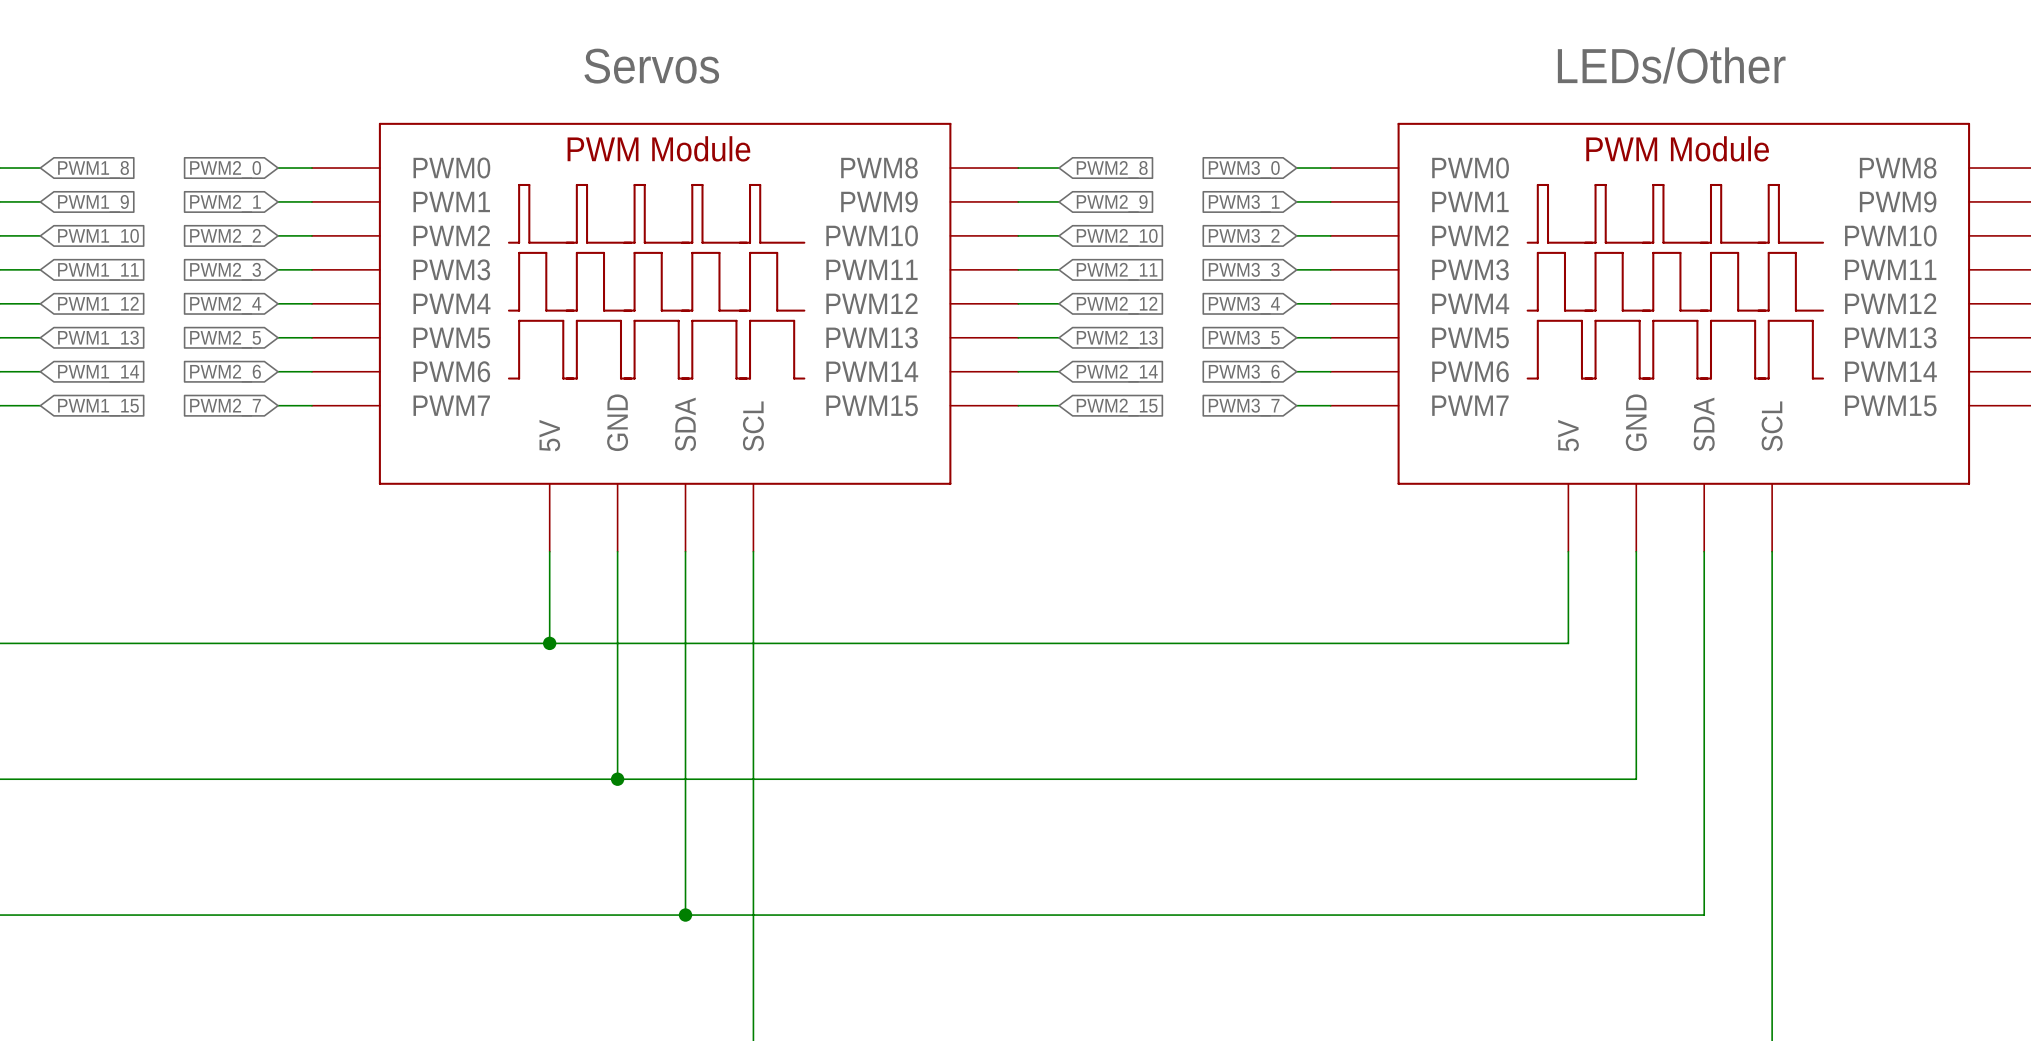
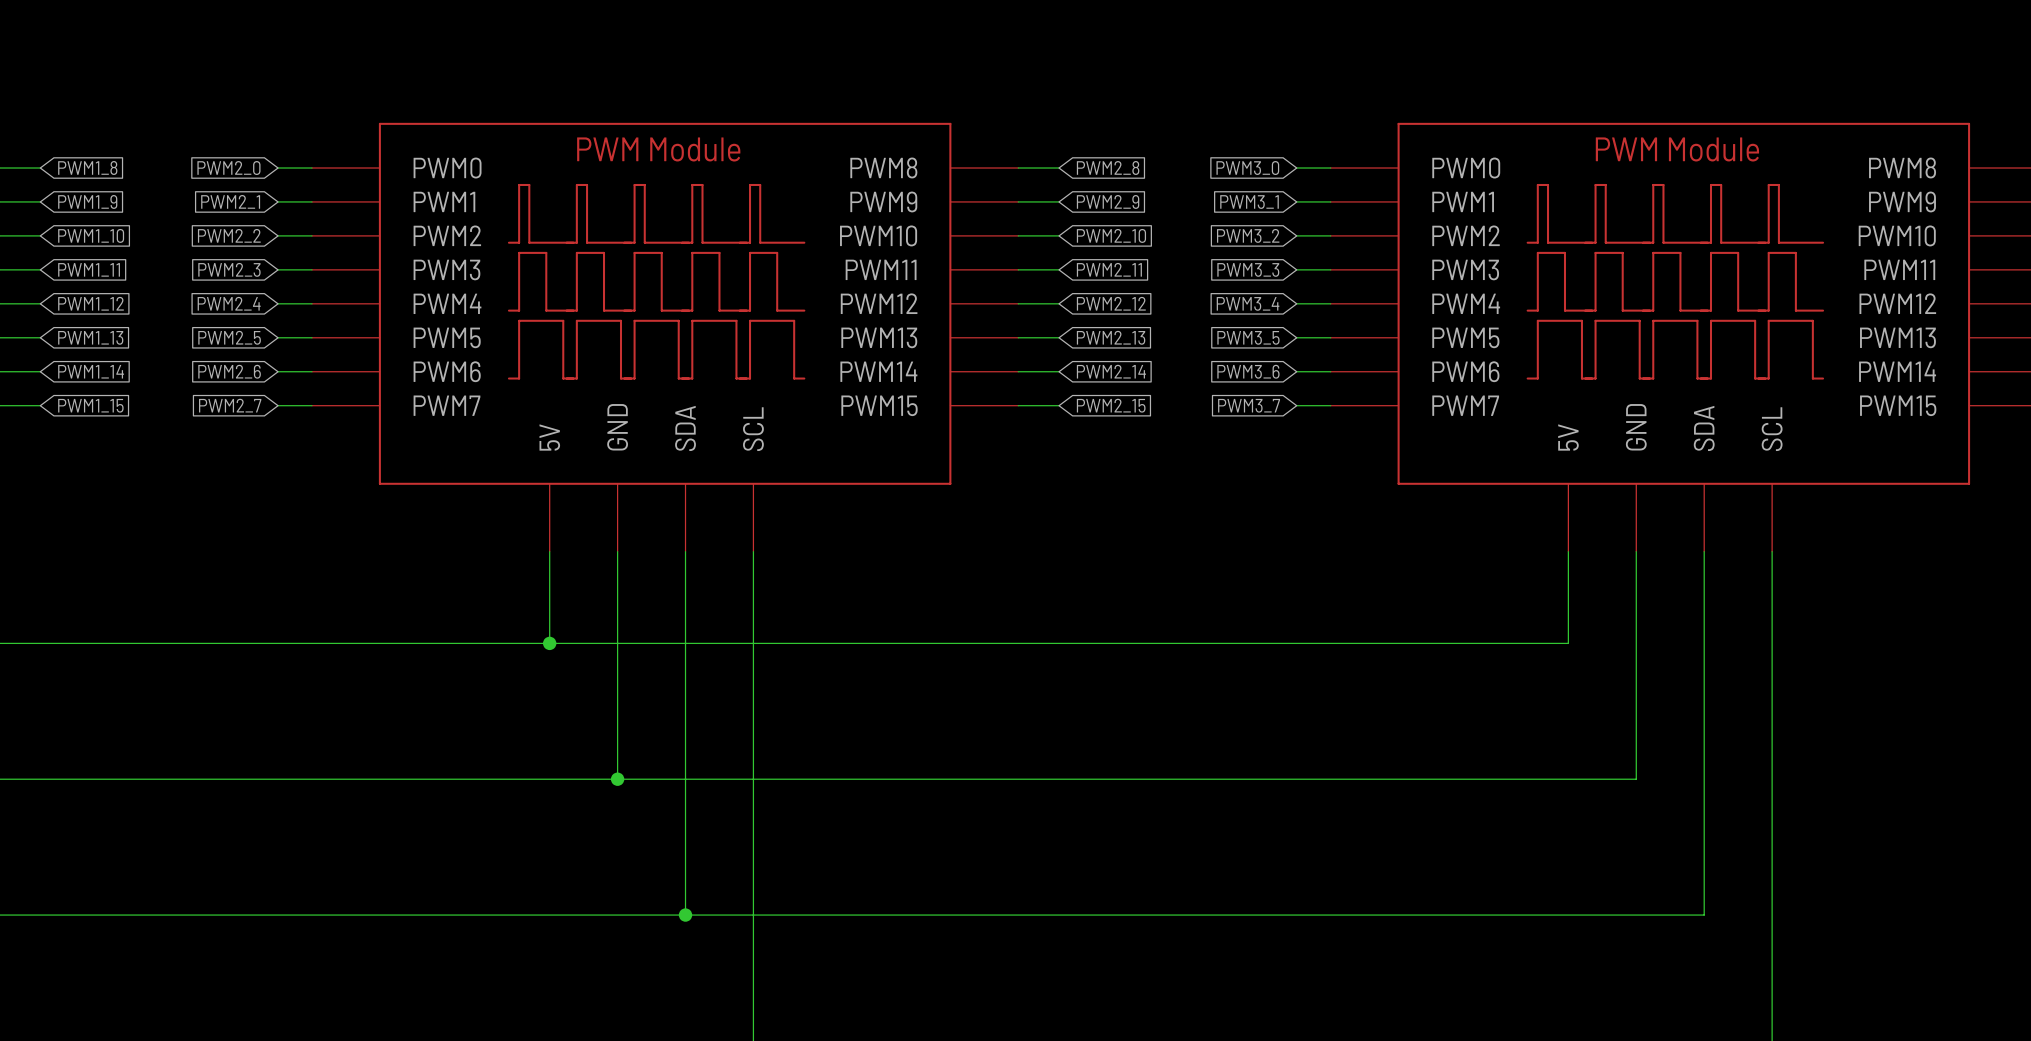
text: LEDs/Other (1671, 65) -> none
text: Servos (651, 66) -> none

